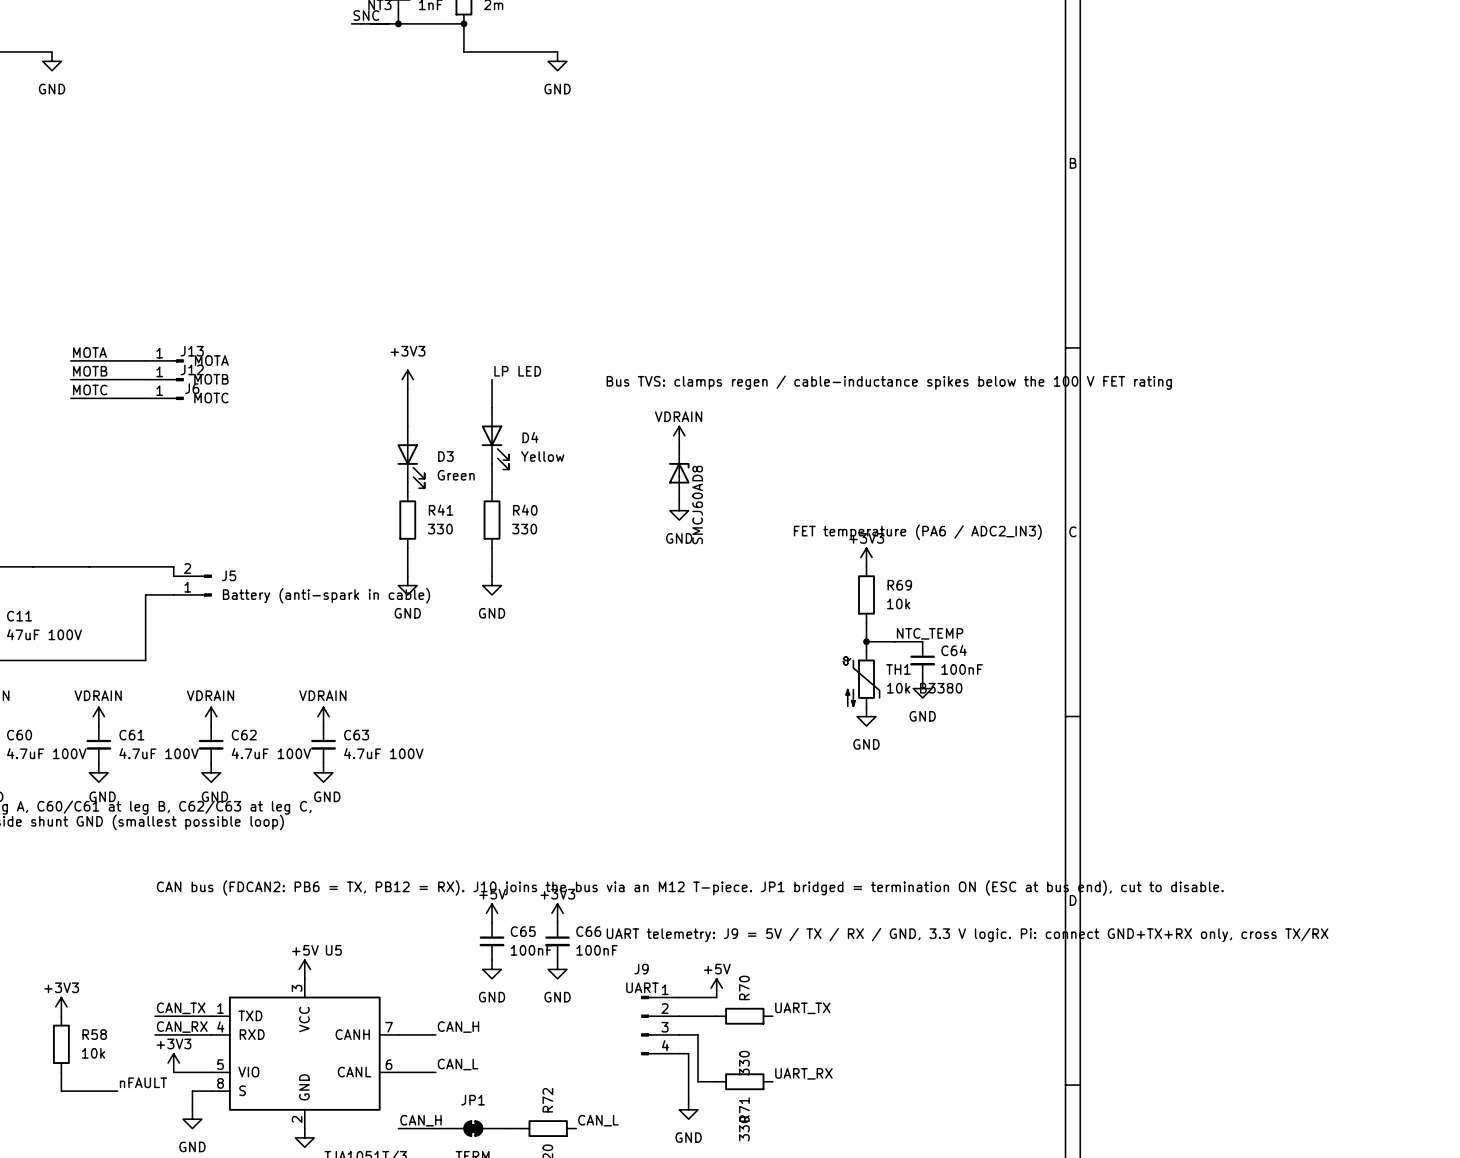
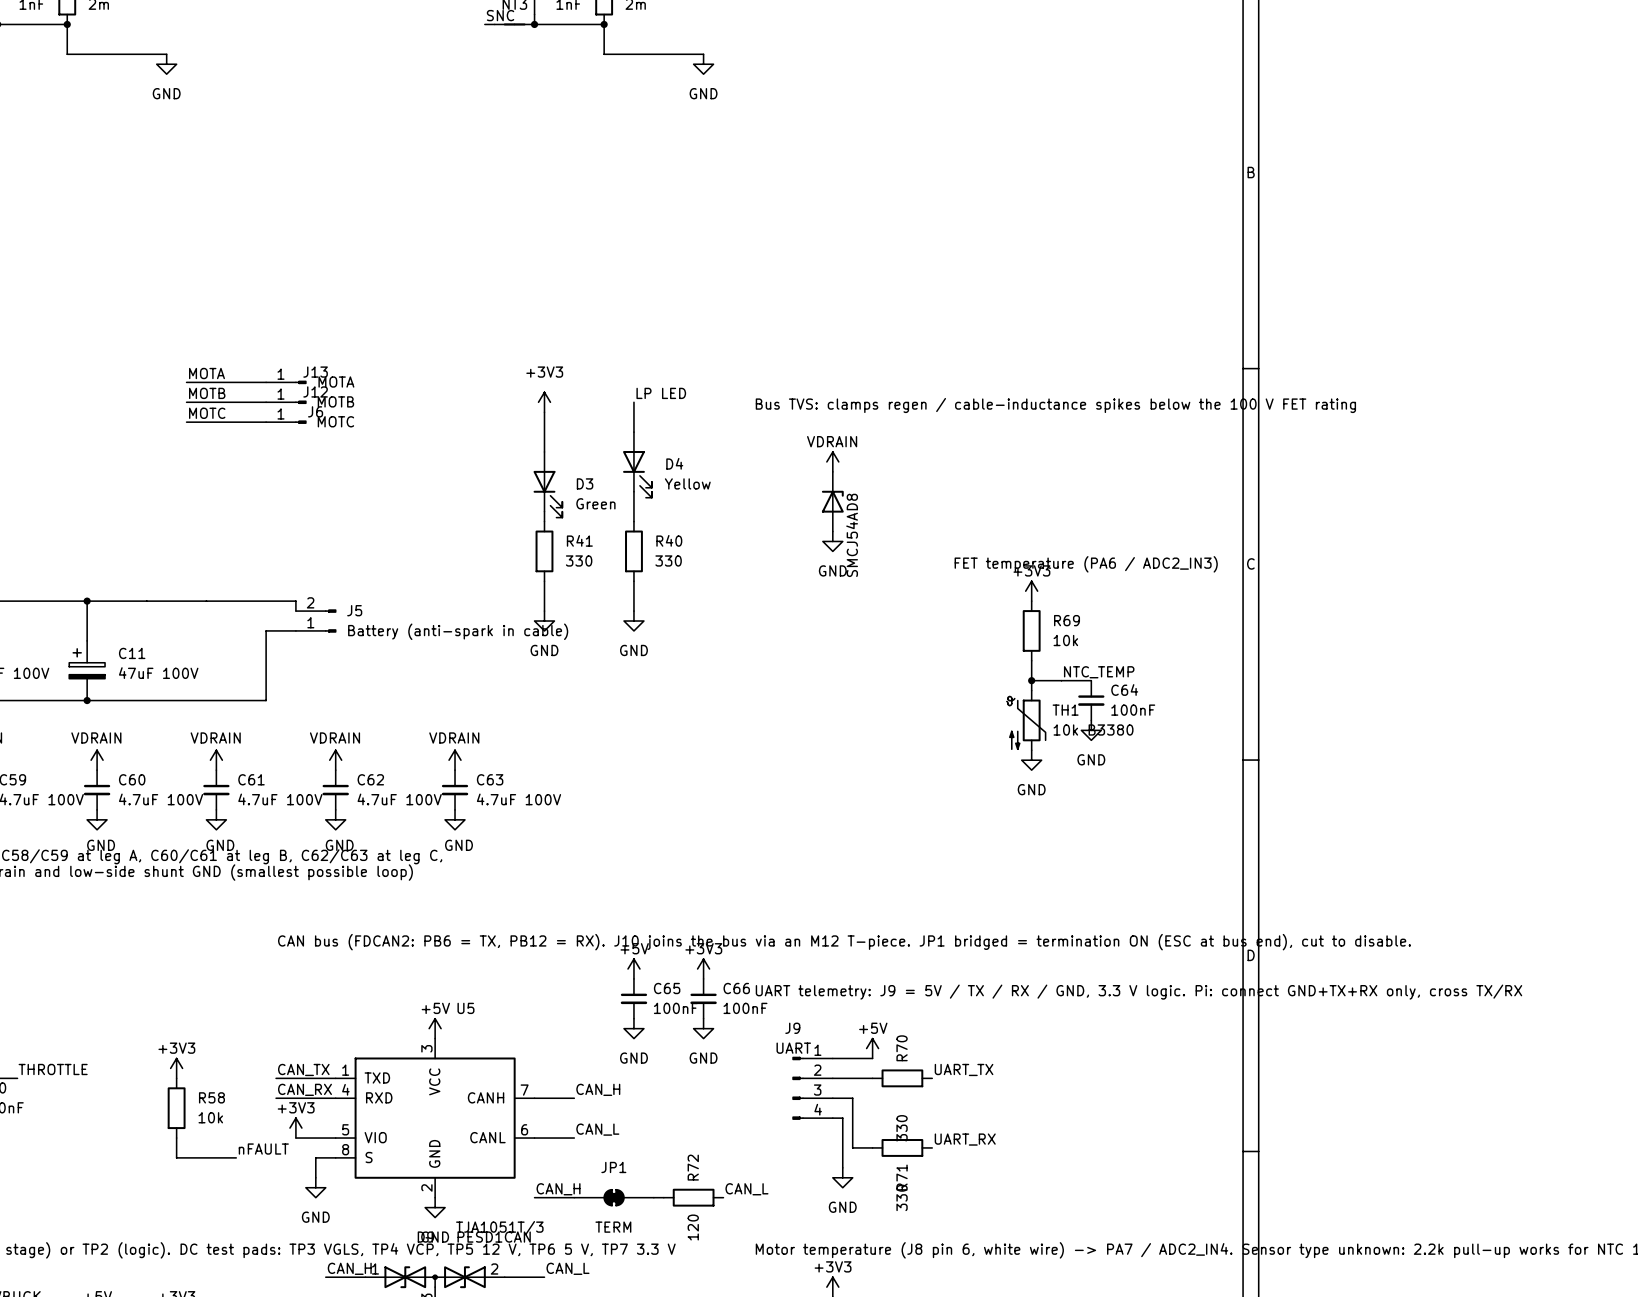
D8 value: SMCJ60A (697, 513) -> SMCJ54A (852, 544)

